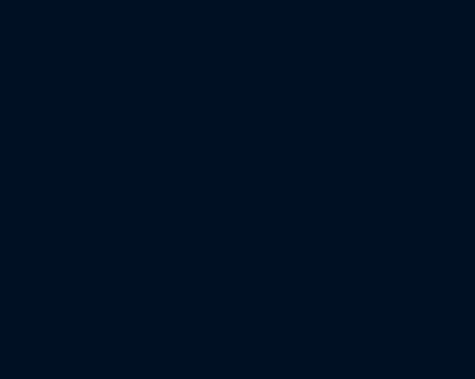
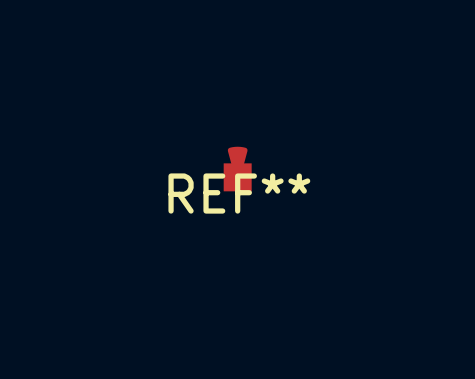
REF**: none -> (237, 169)

